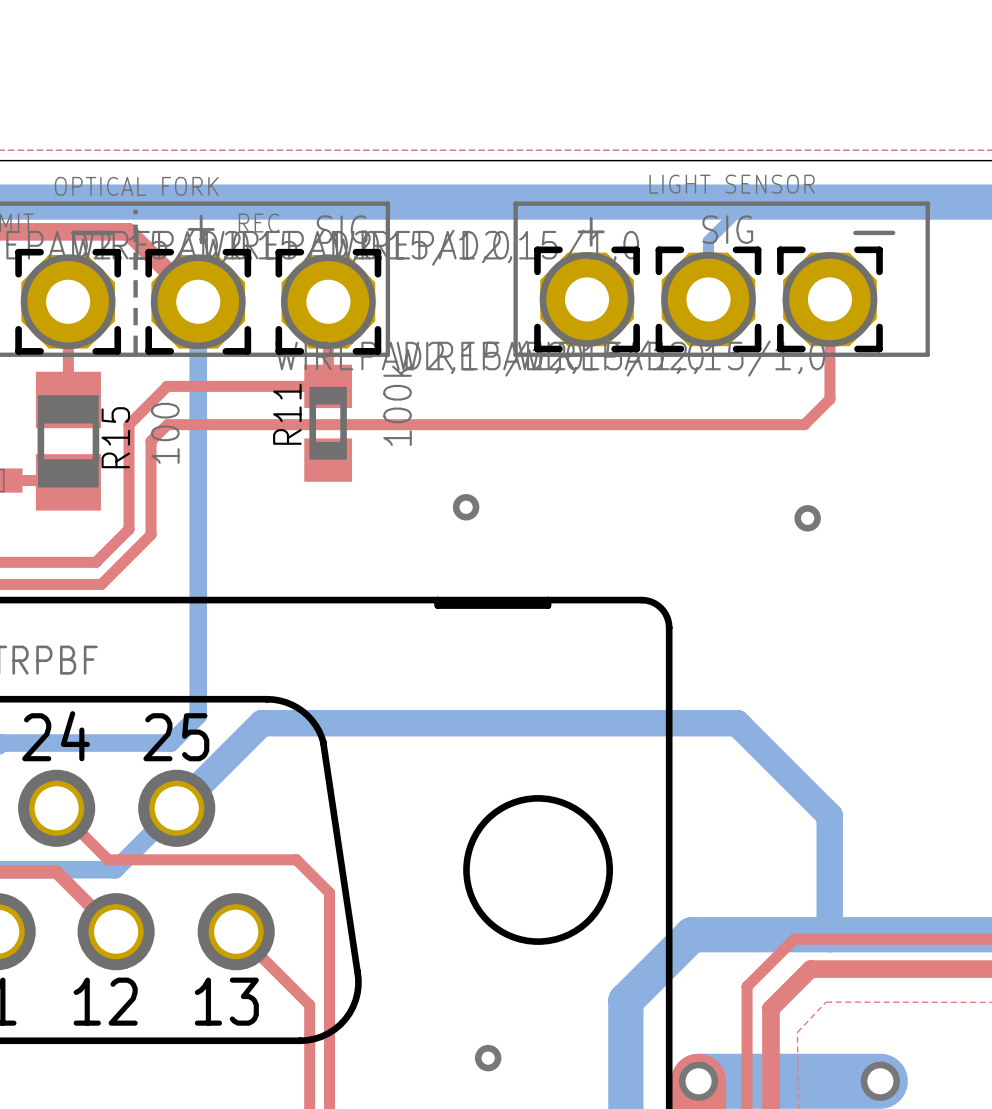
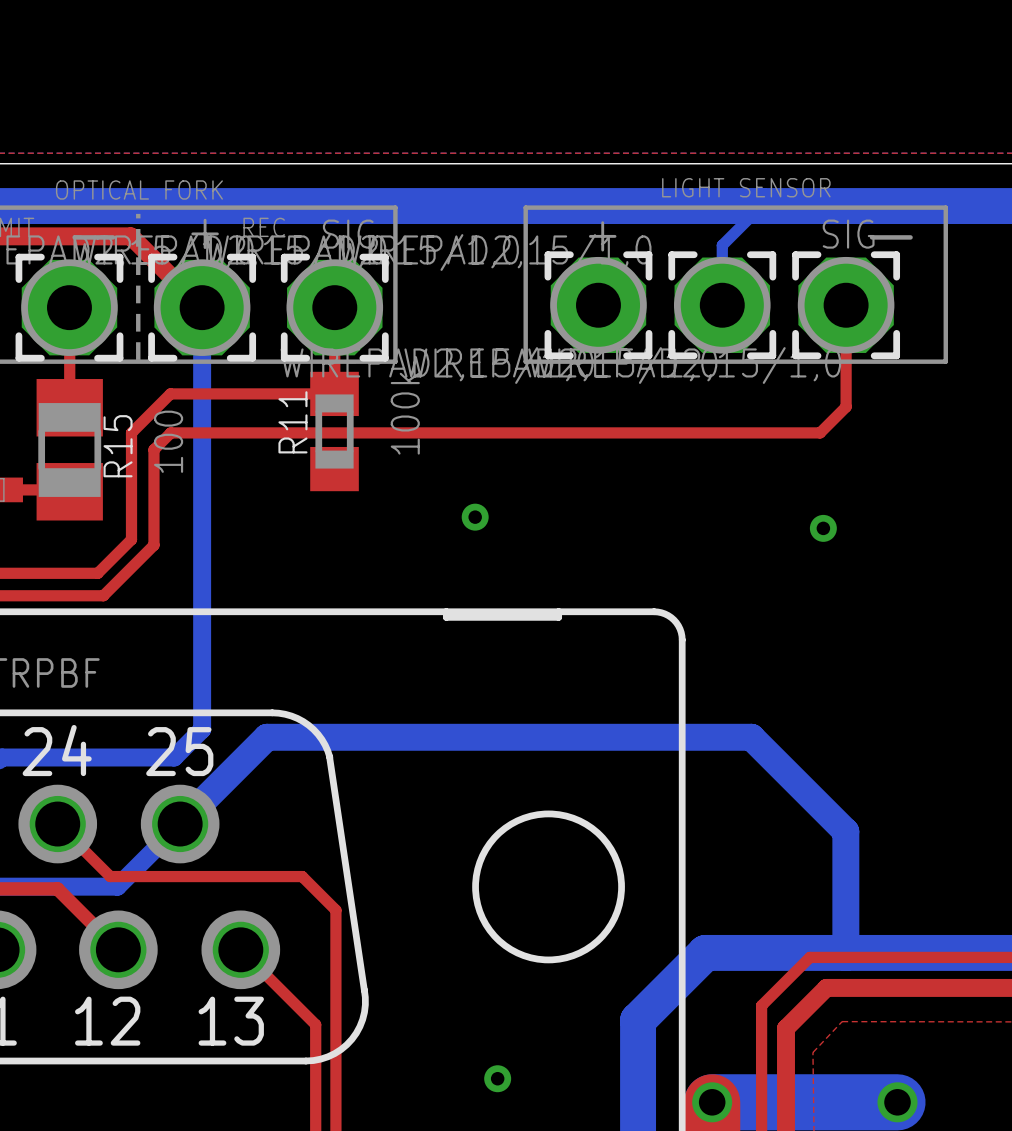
text position: SIG (727, 229) -> SIG (848, 234)

